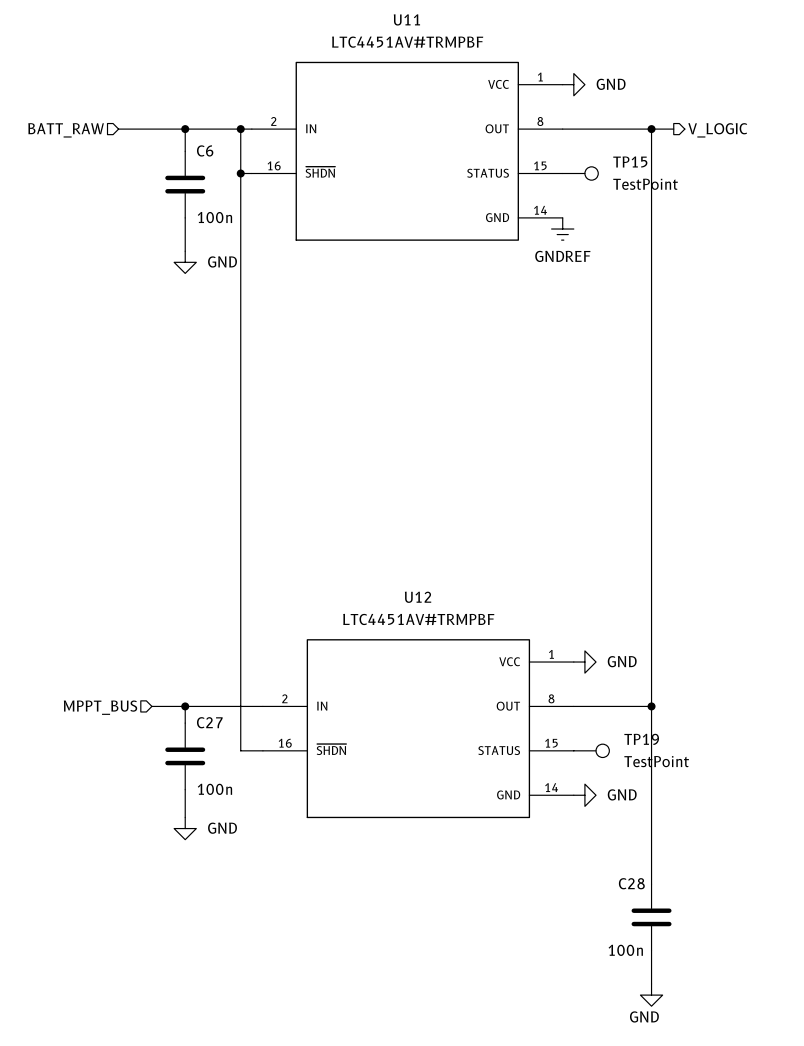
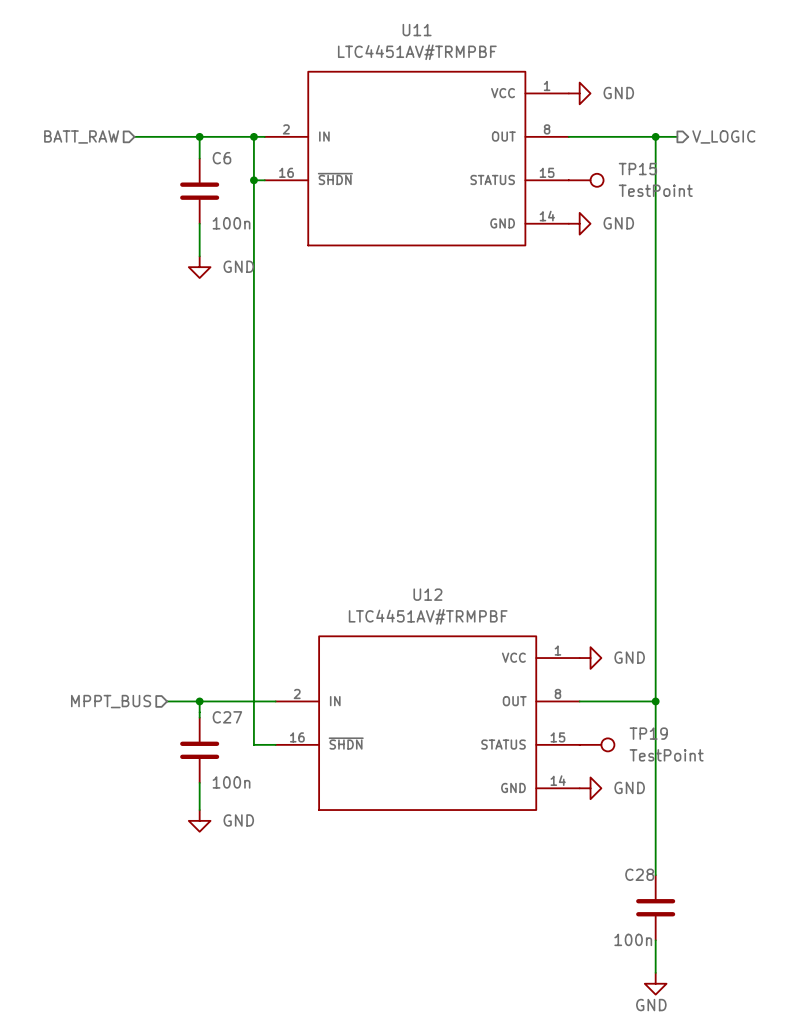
power symbol: none -> GND (579, 223)
power symbol: GNDREF (562, 229) -> none

